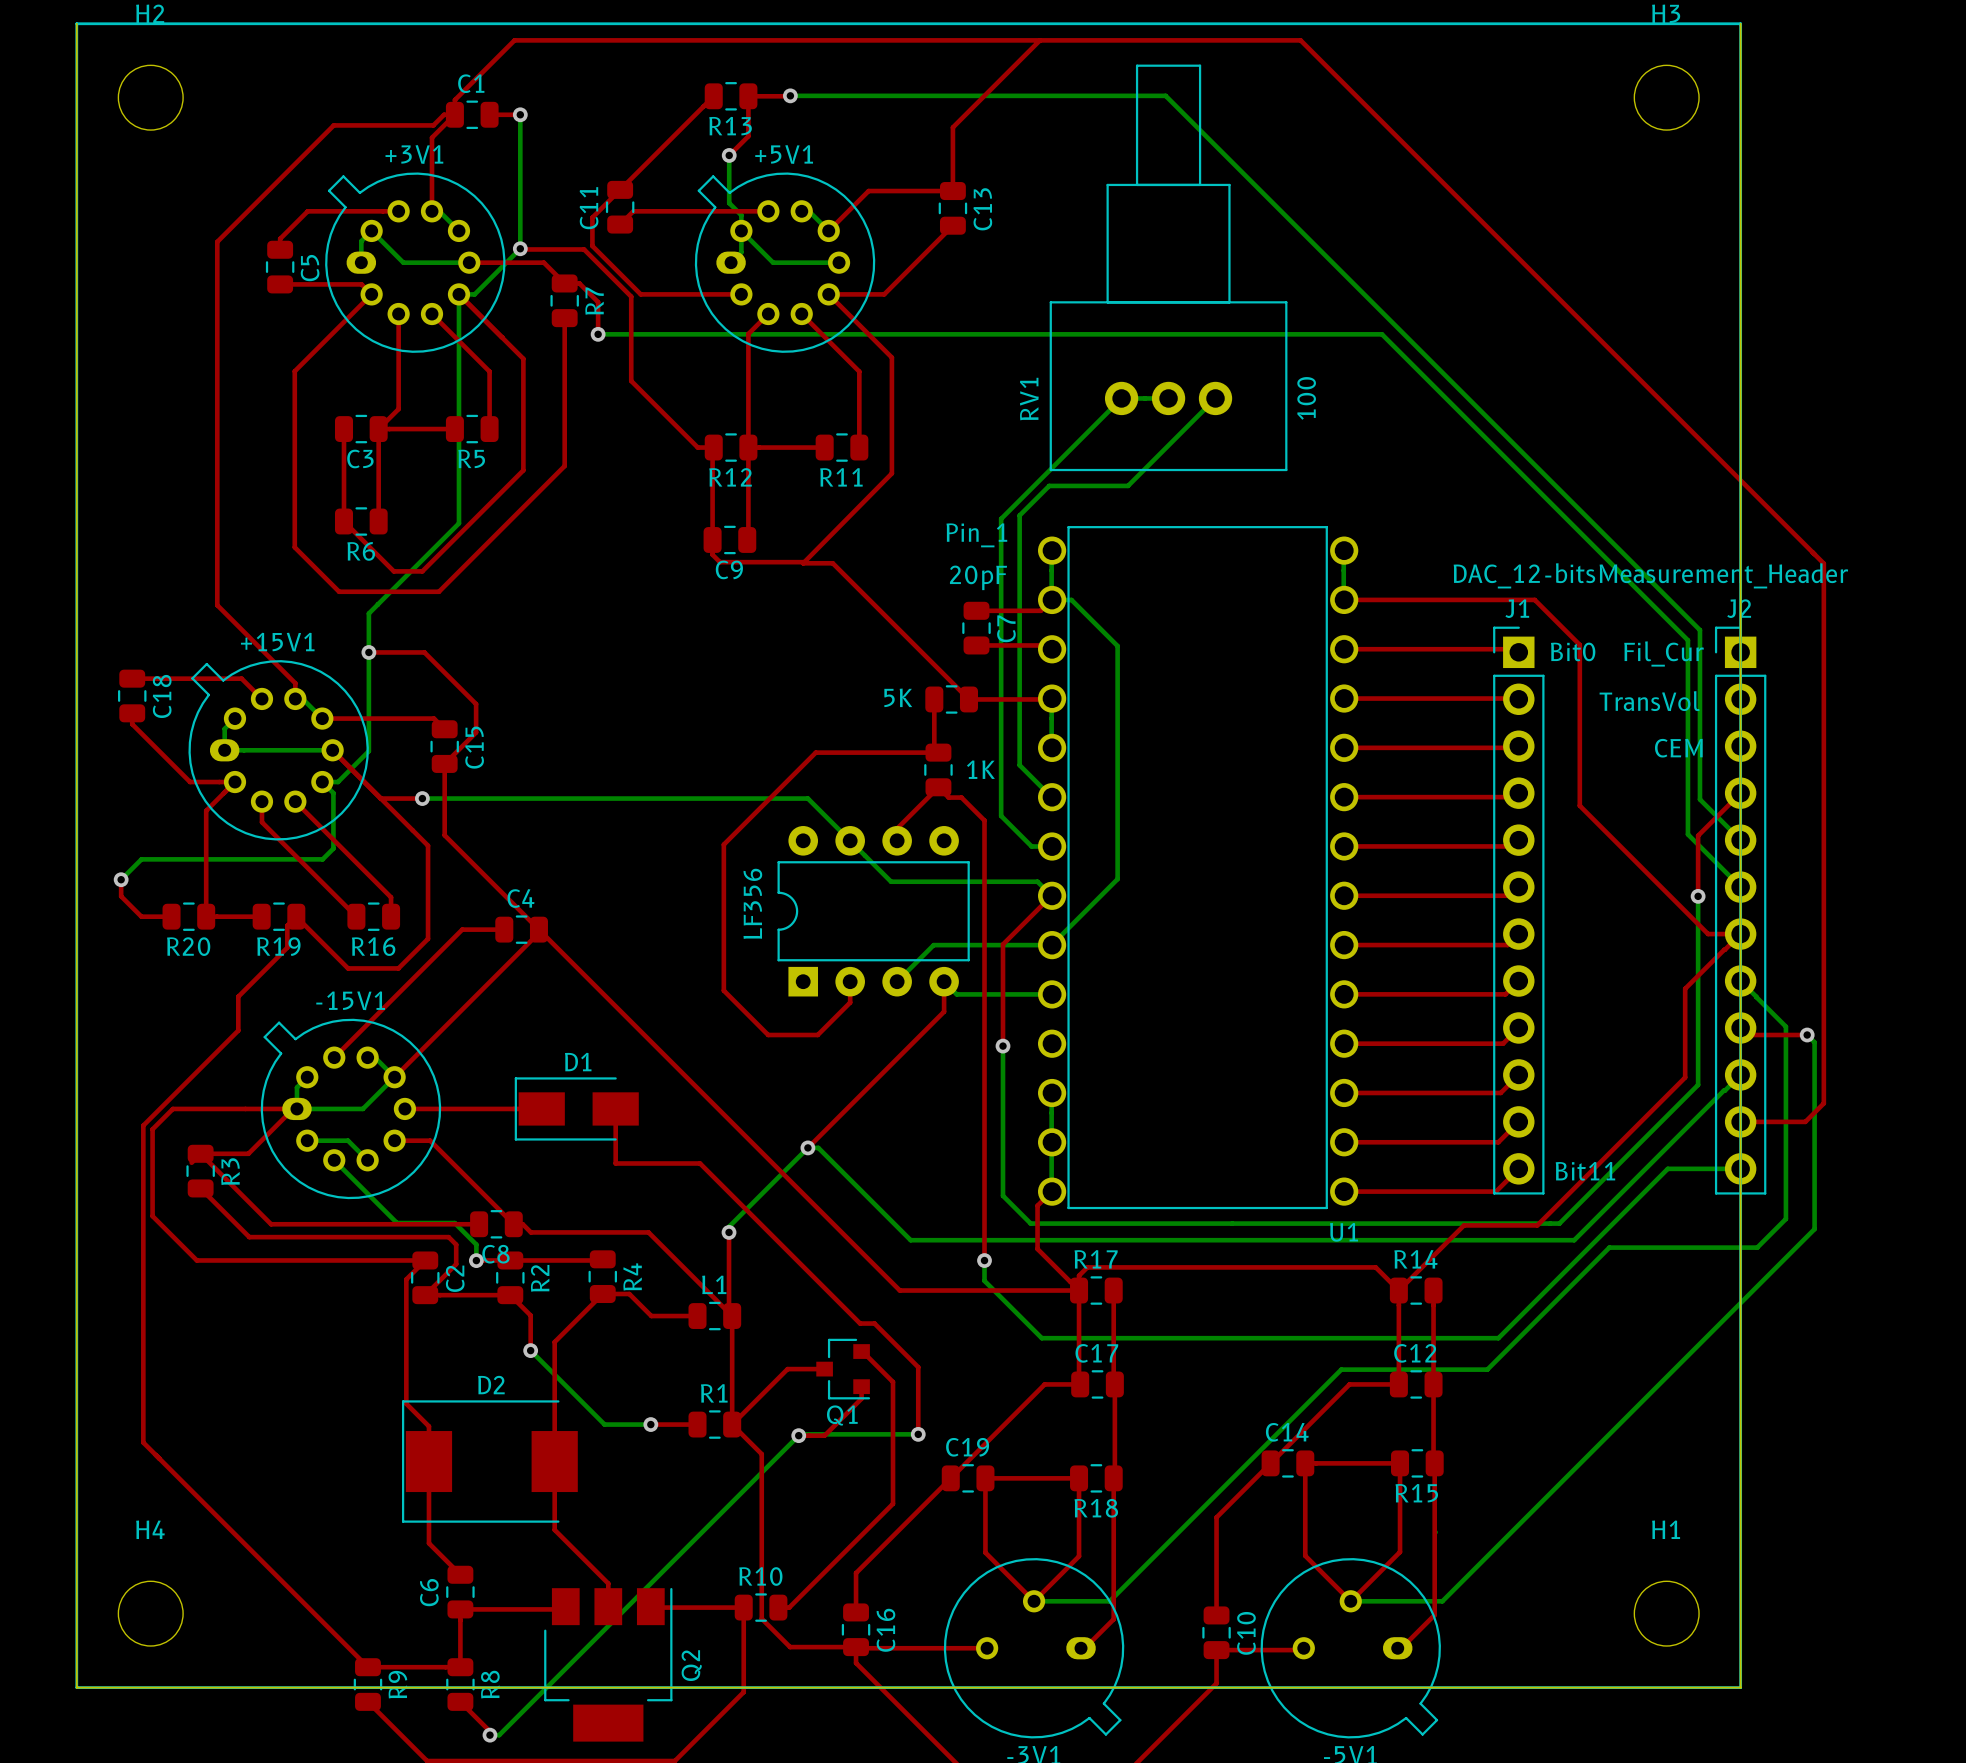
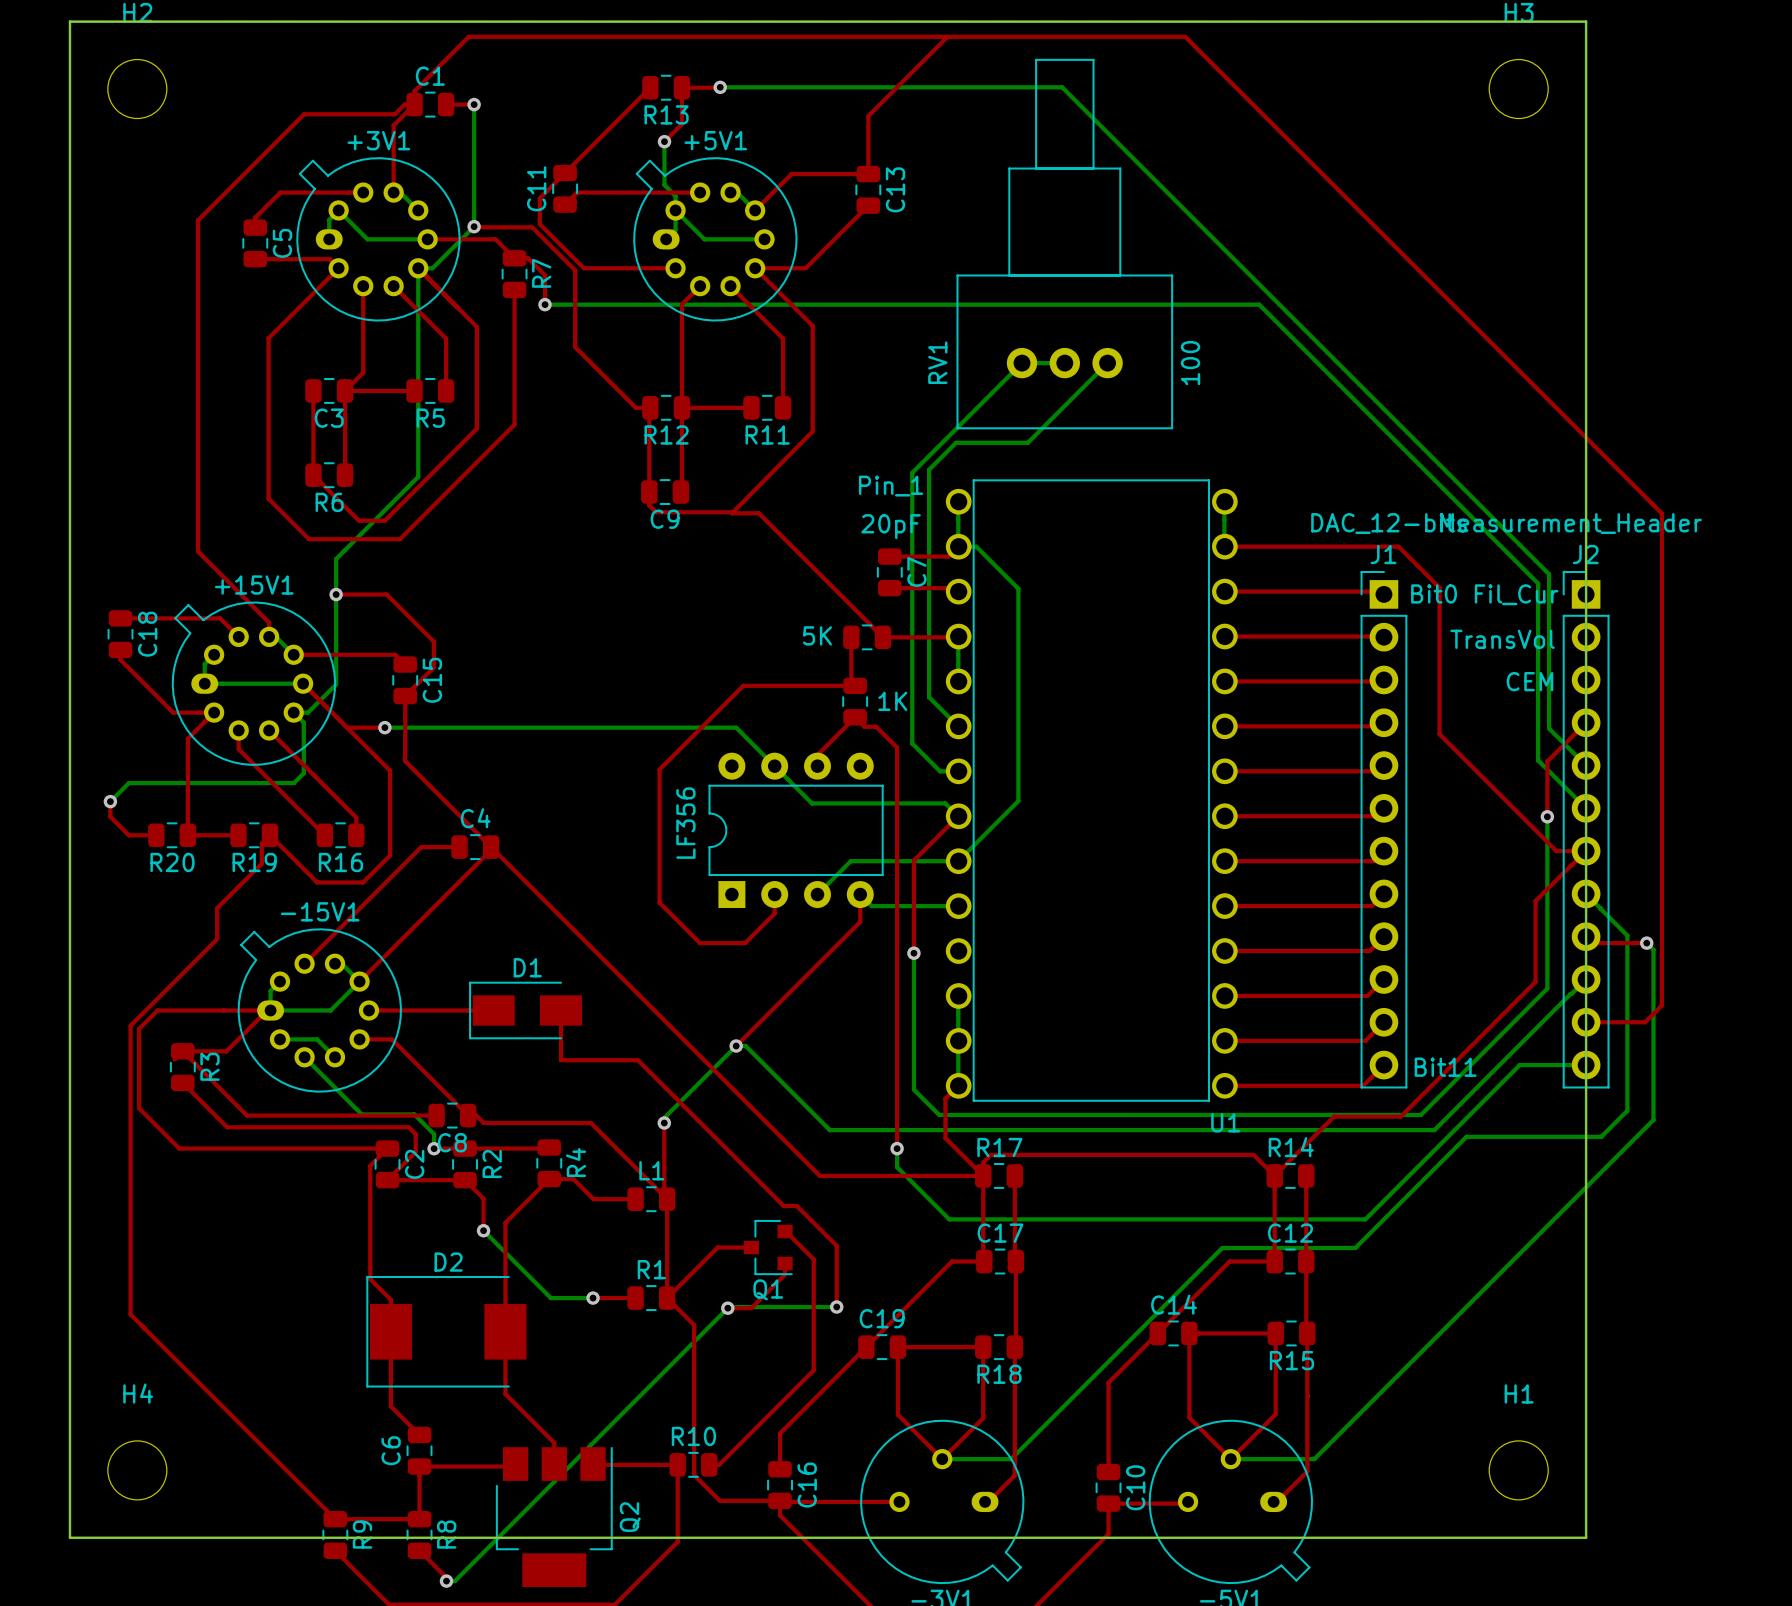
board edge: none -> (69, 21) (1586, 21)

